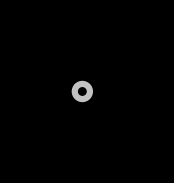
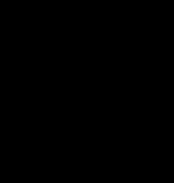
via: (82, 91) -> none

